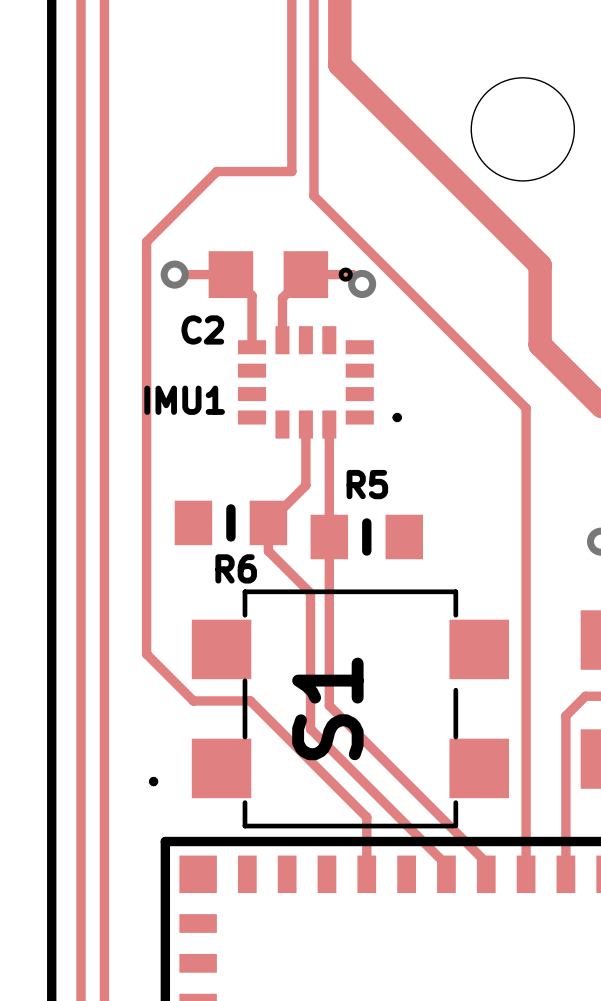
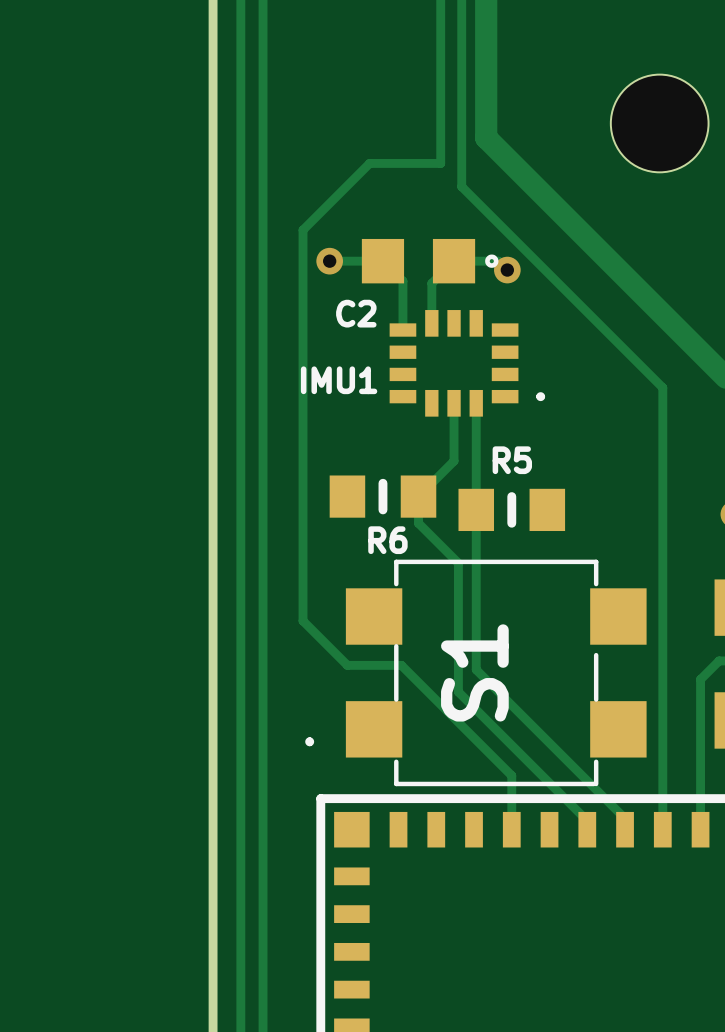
track: (339, 64) (540, 265) (540, 344) -> (486, 62) (486, 137) (676, 327)

